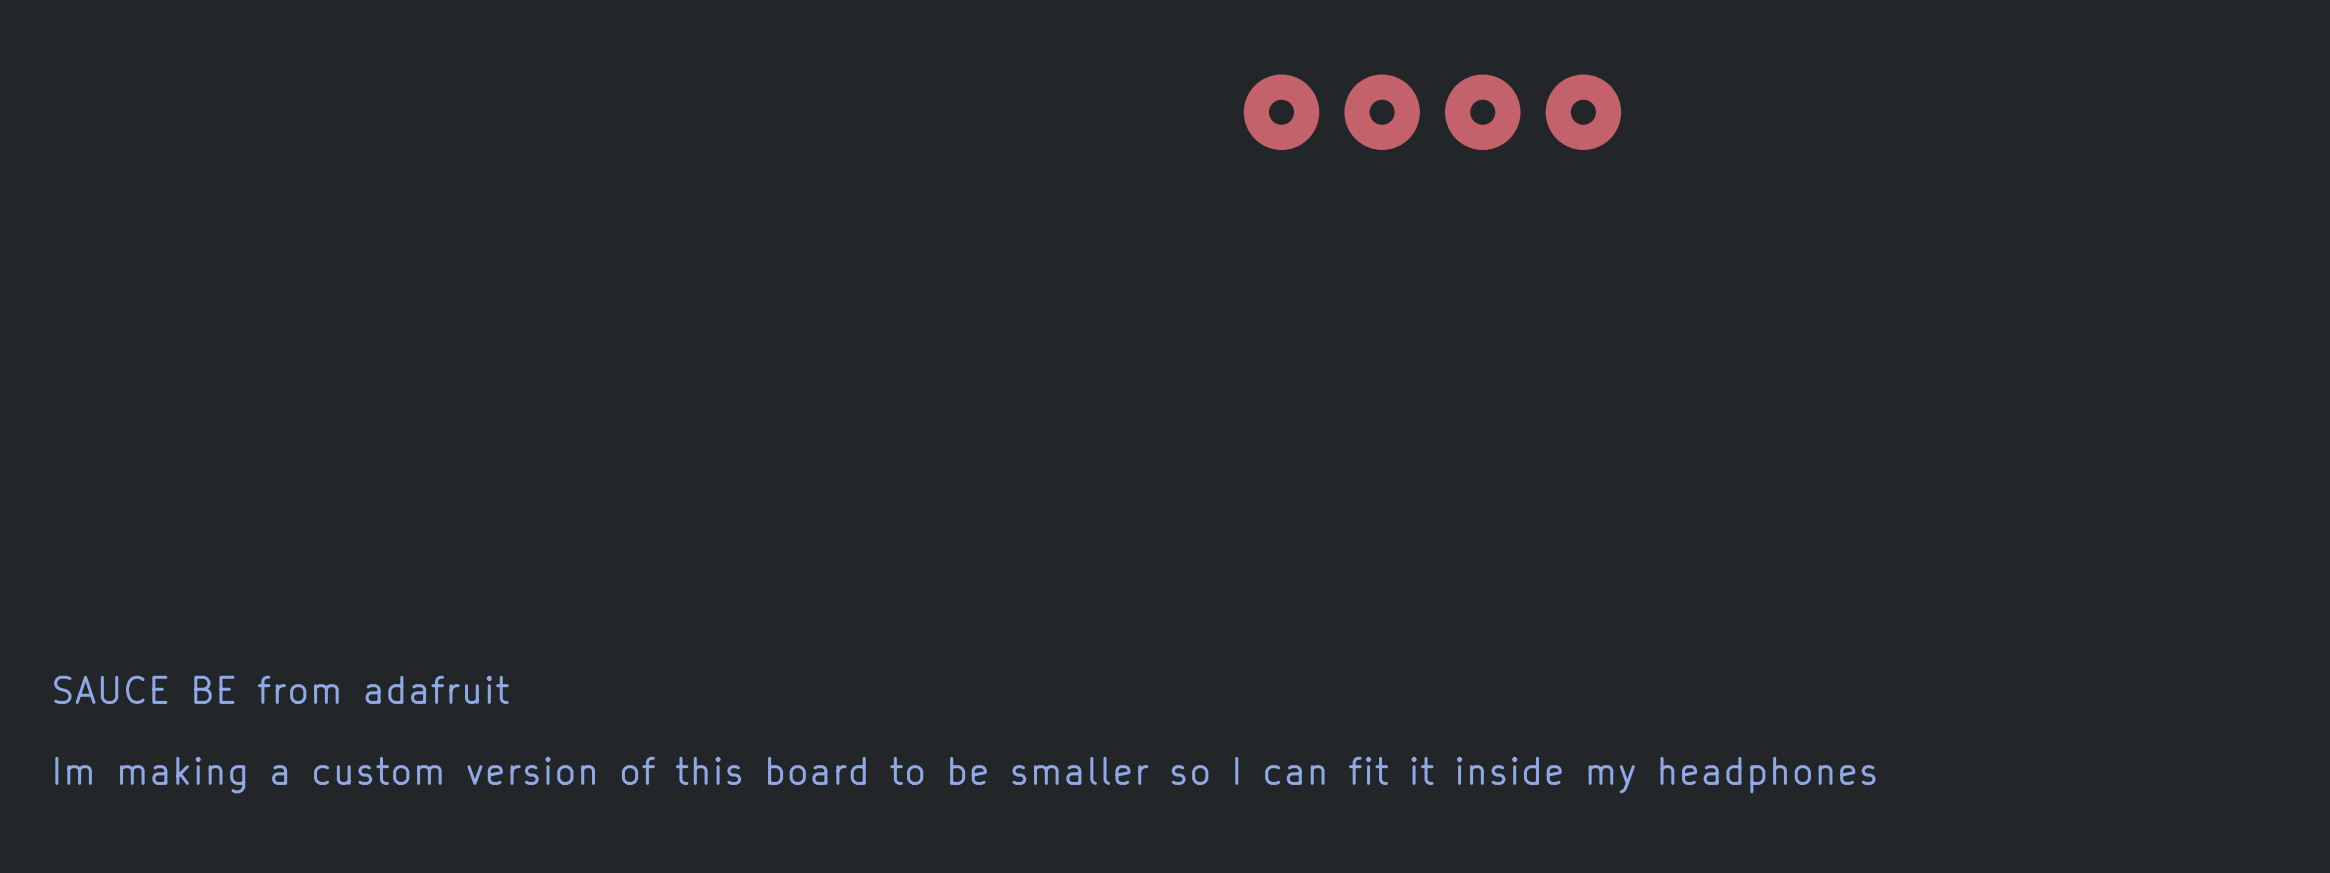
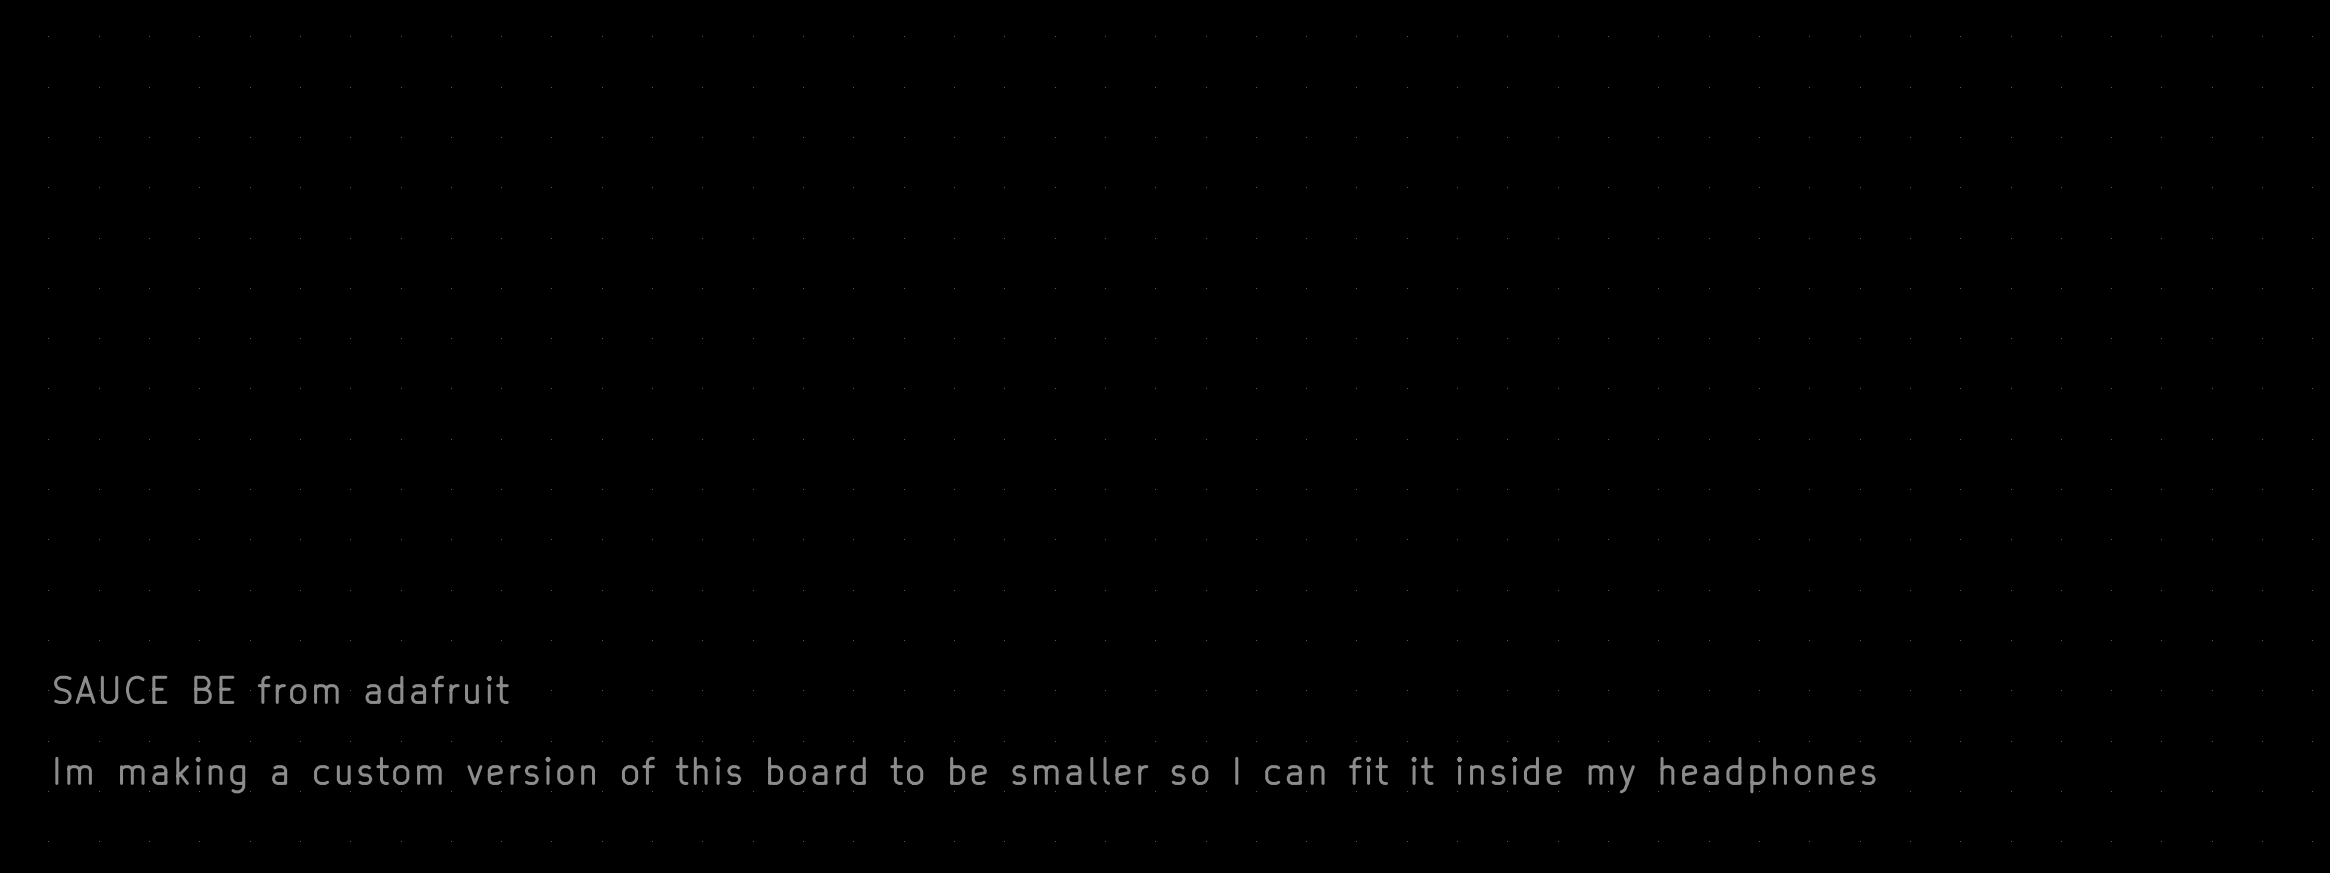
part: (1281, 112) -> none
part: (1382, 112) -> none
part: (1482, 112) -> none
part: (1583, 112) -> none

